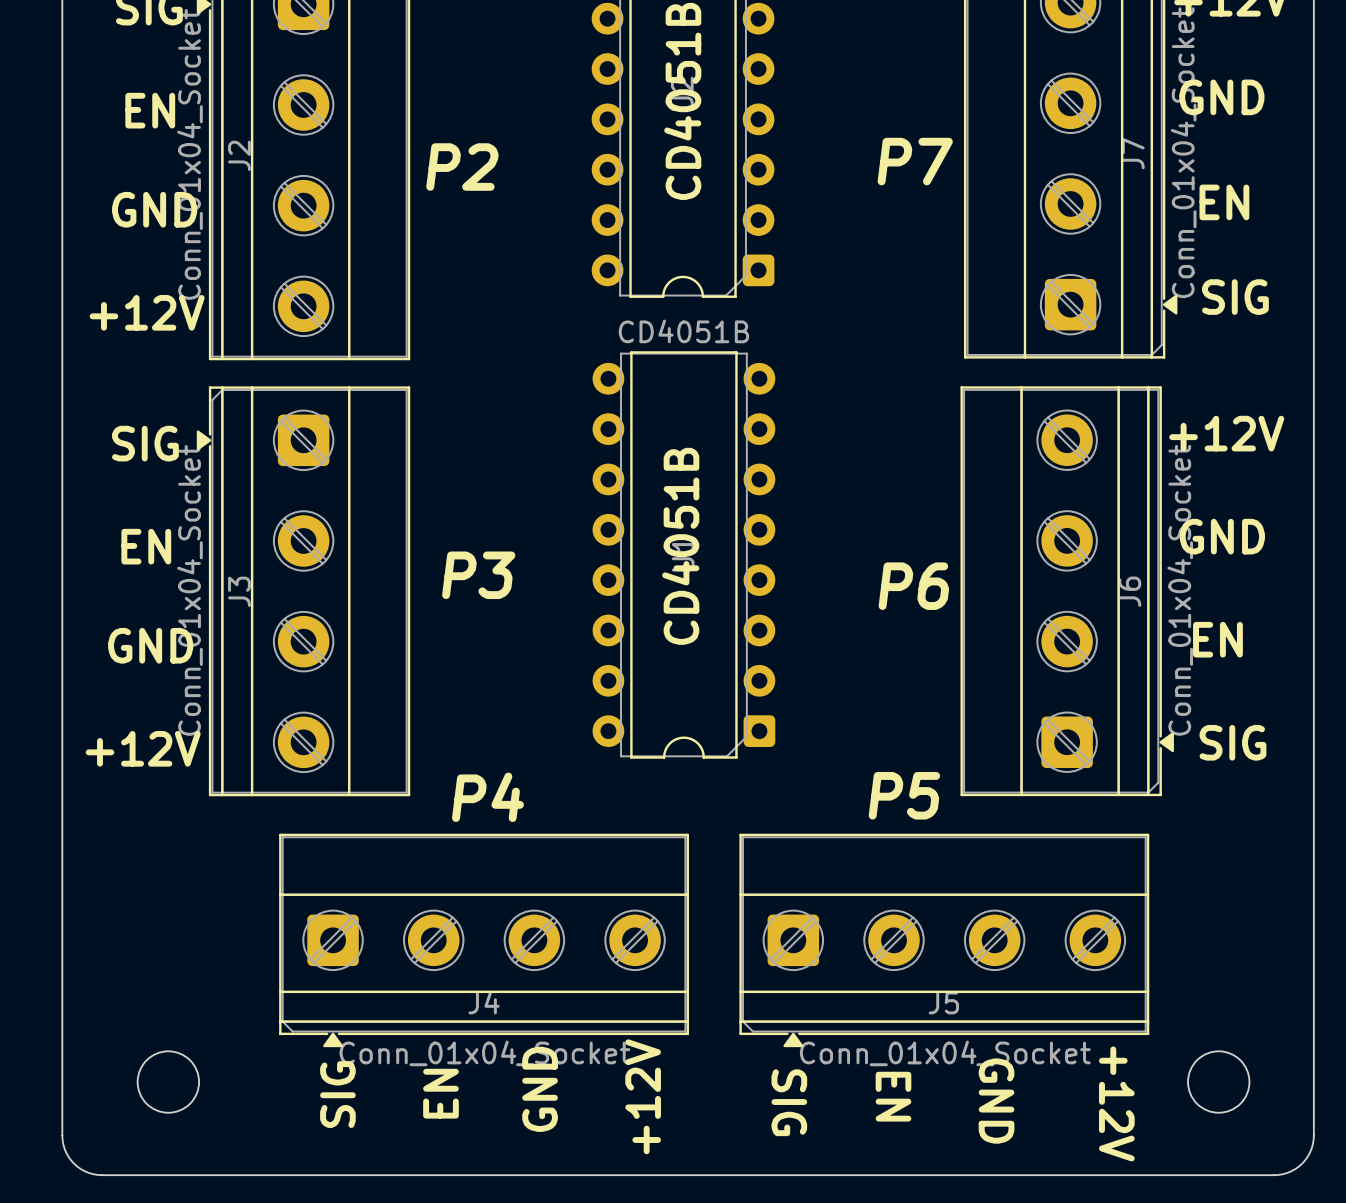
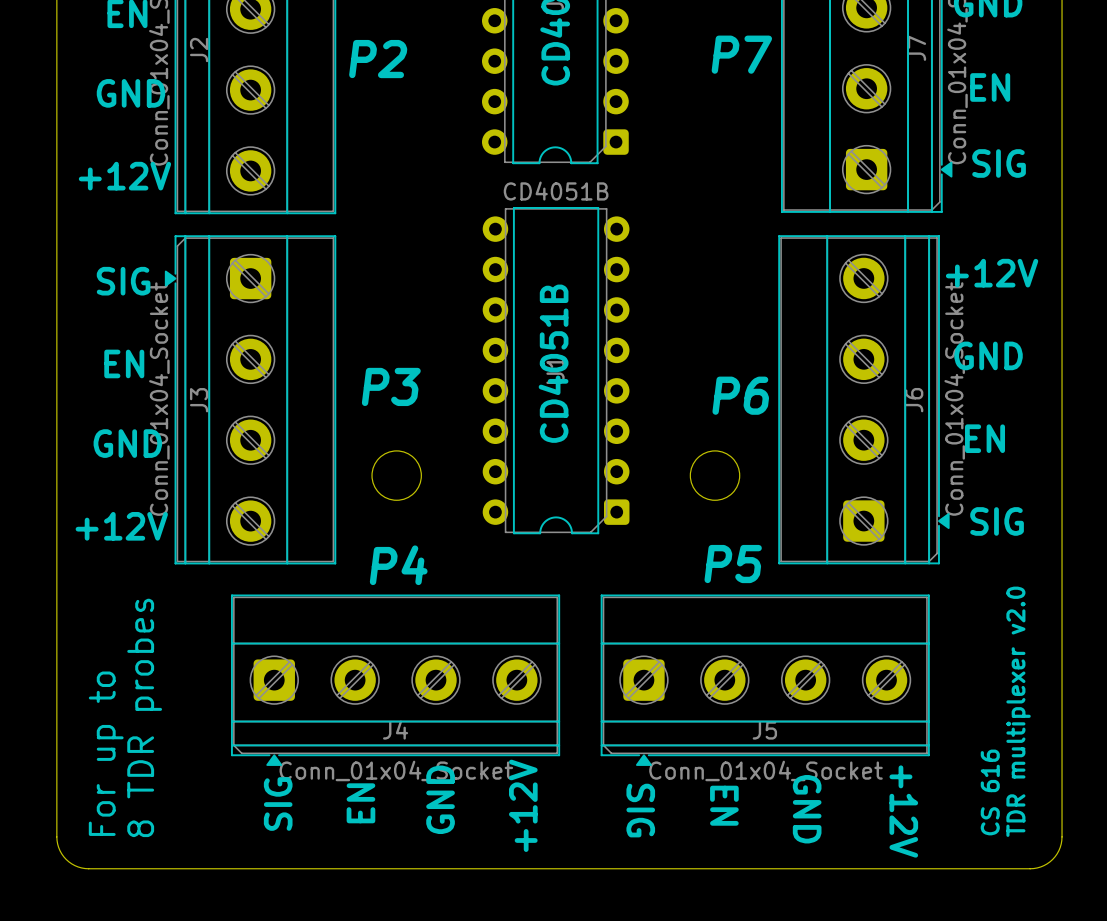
round board edge: none -> [371, 450, 422, 501]
round board edge: none -> [689, 450, 741, 501]
text: none -> TDR multiplexer v2.0 (1018, 711)
text: none -> 8 TDR probes (144, 717)
text: none -> For up to (106, 753)
round board edge: [137, 1050, 200, 1114] -> none
round board edge: [1187, 1050, 1250, 1114] -> none
text: none -> CS 616 (990, 792)

